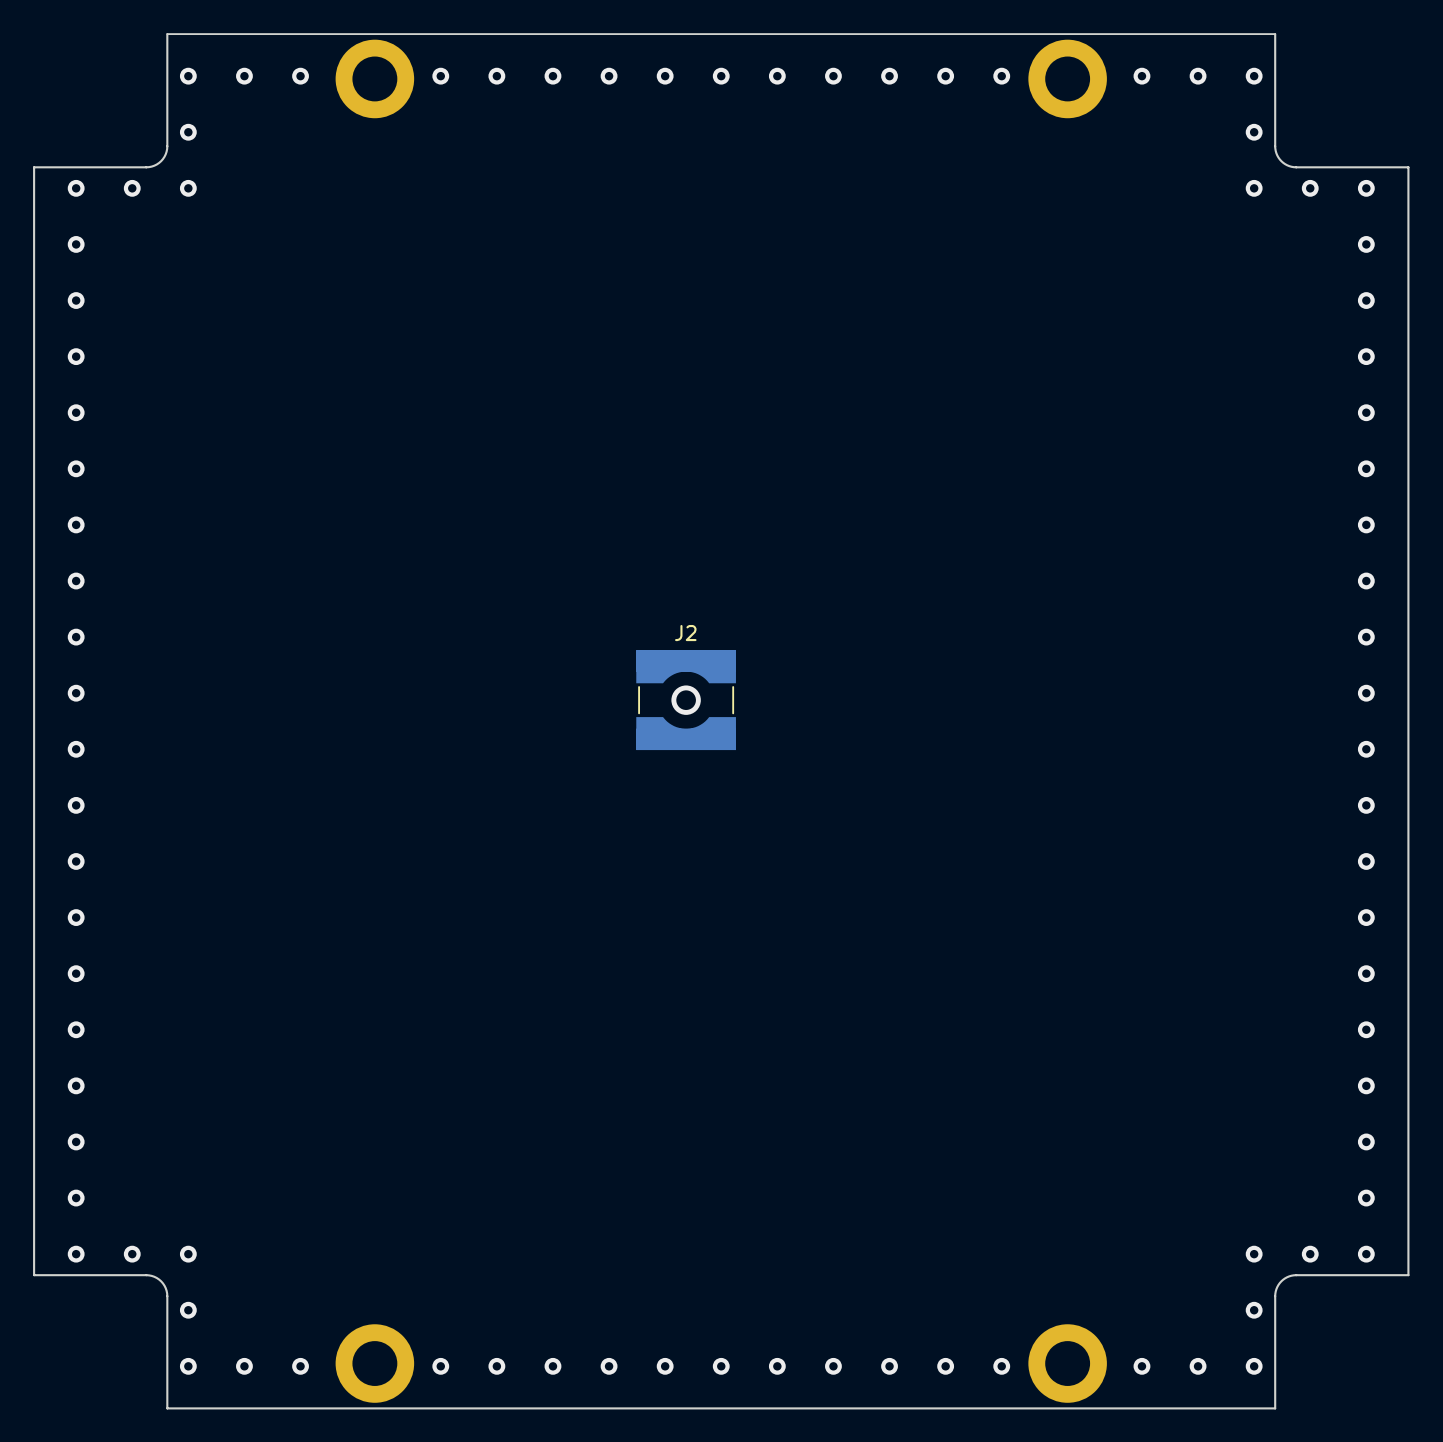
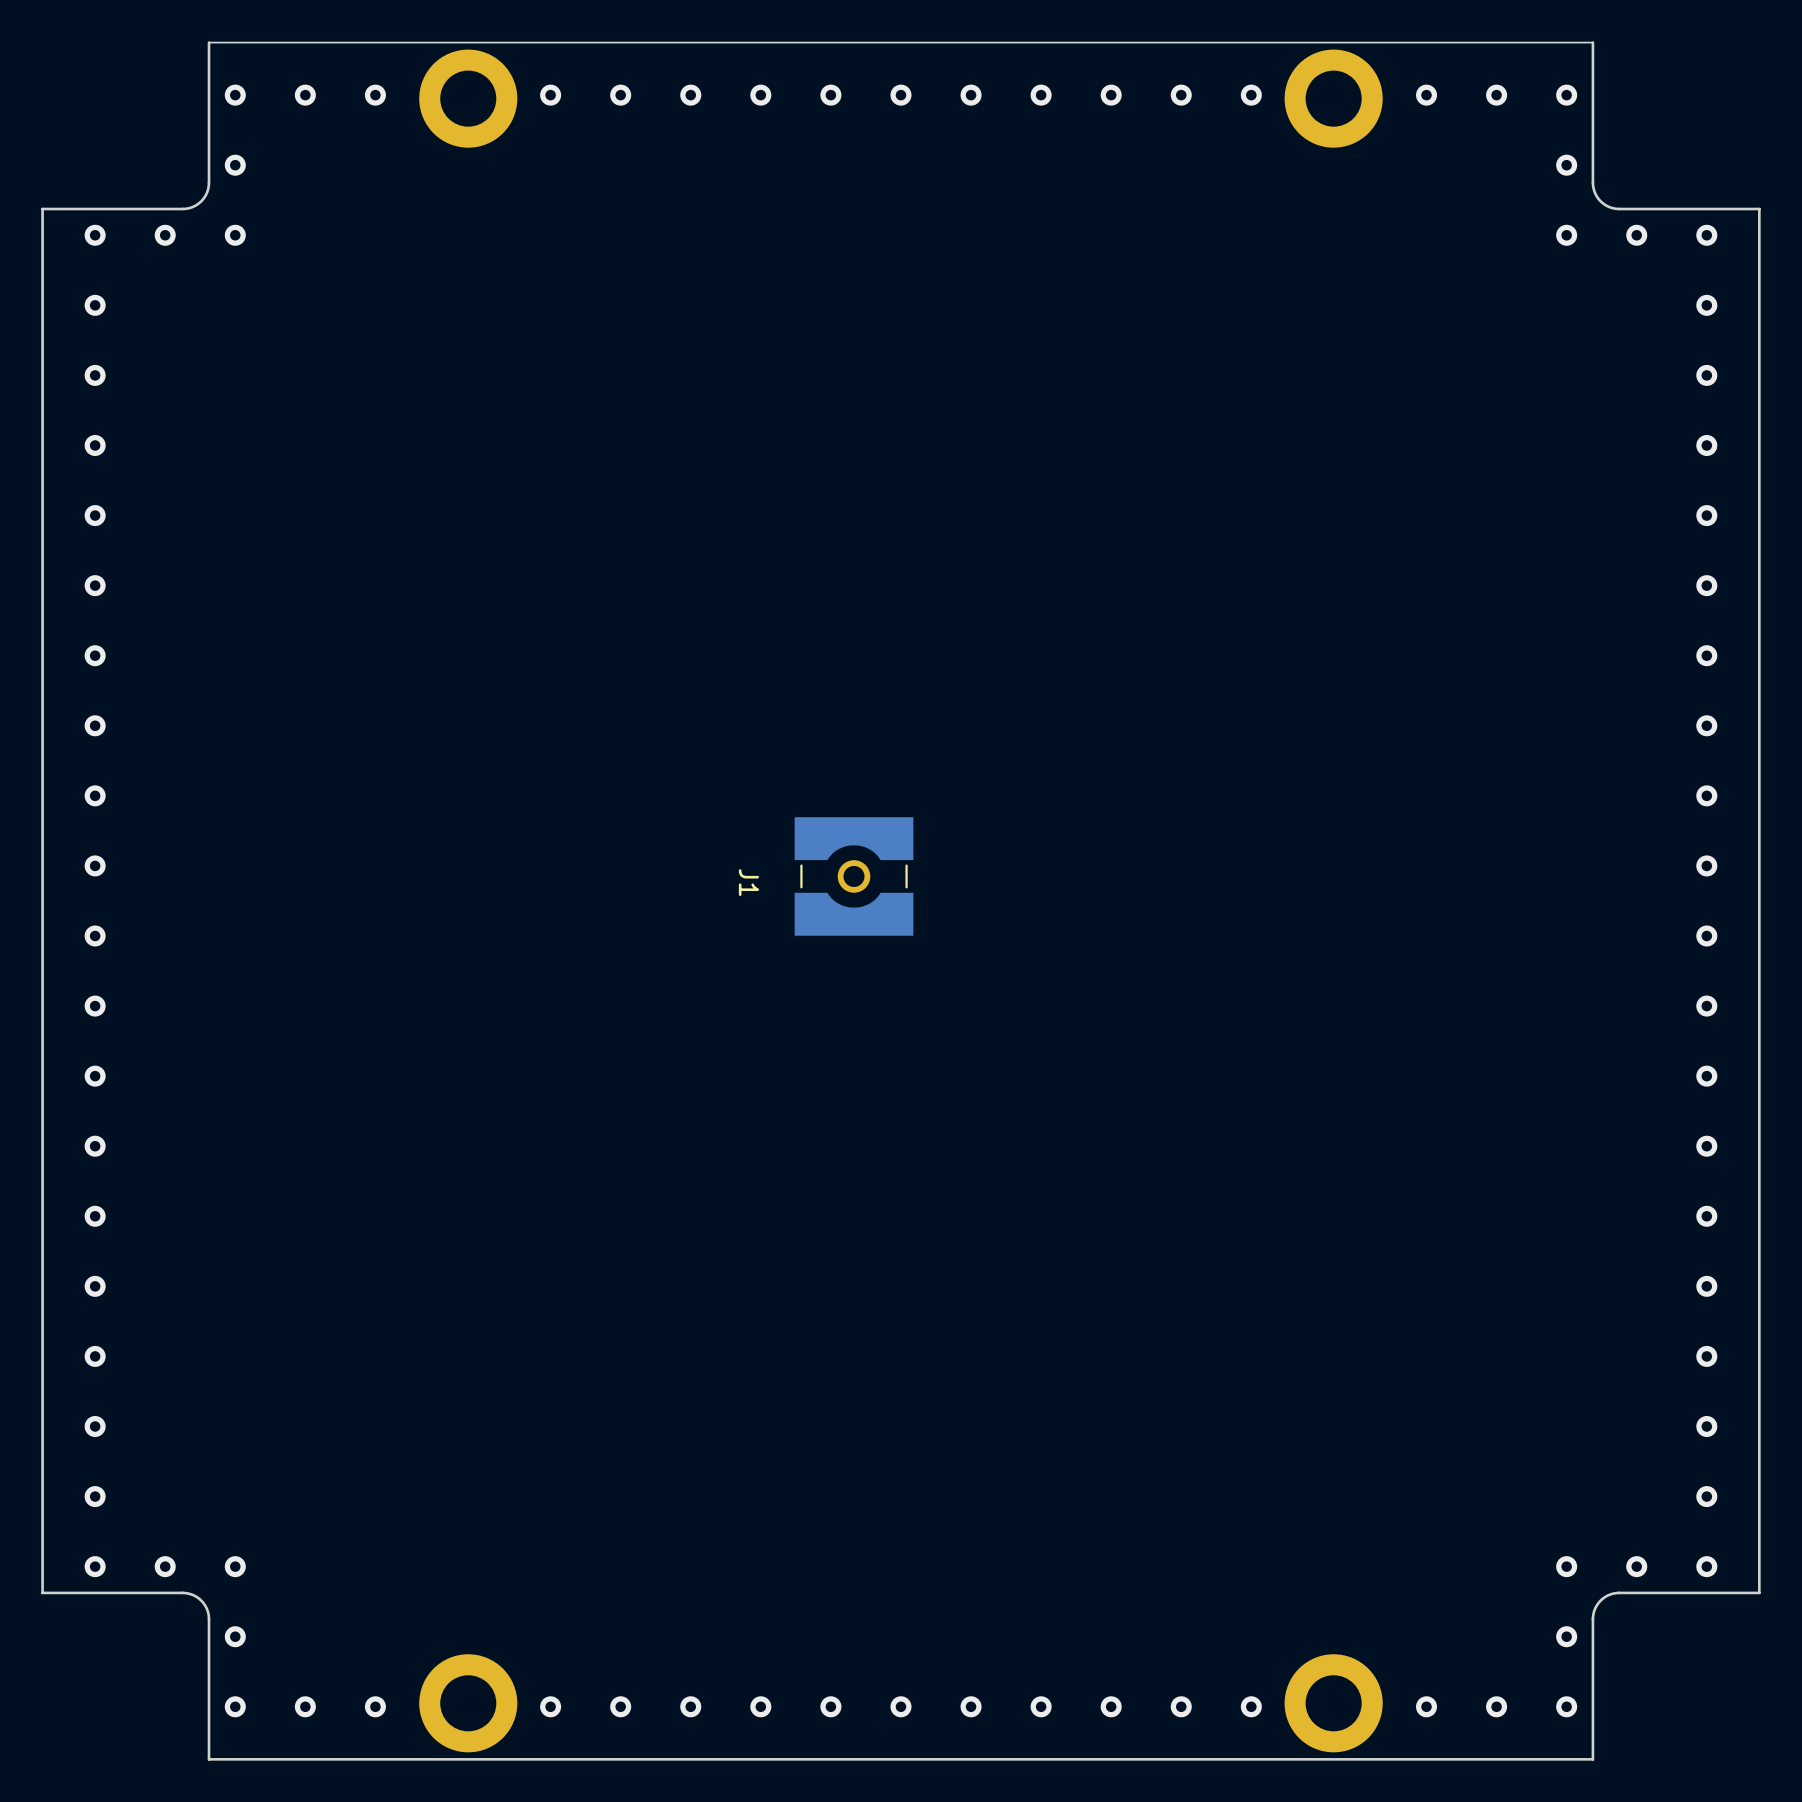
J2: (686, 700) -> none
via: (686, 700) -> none
J1: none -> (854, 876)

